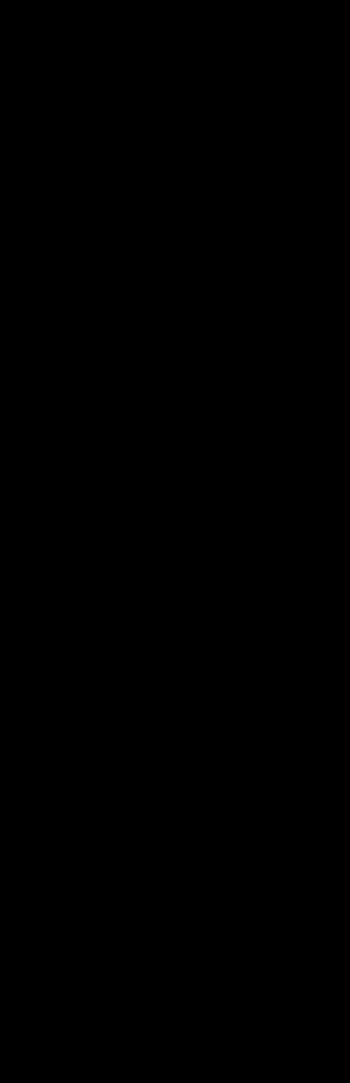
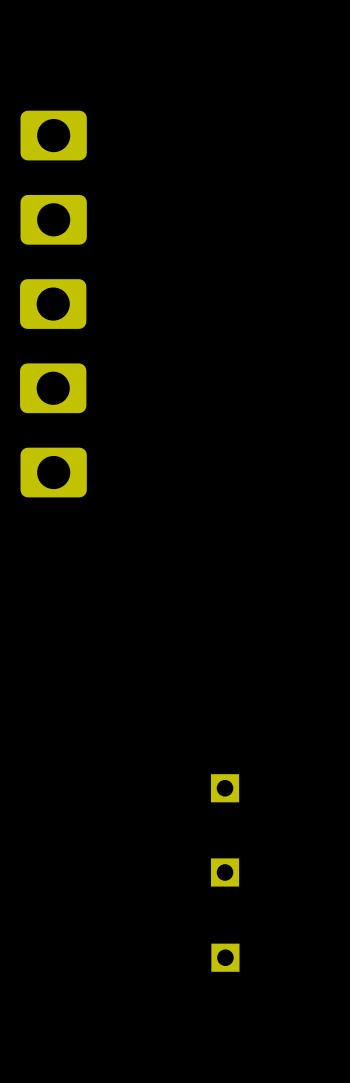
part: none -> (53, 304)
part: none -> (225, 788)
part: none -> (225, 872)
part: none -> (225, 957)

